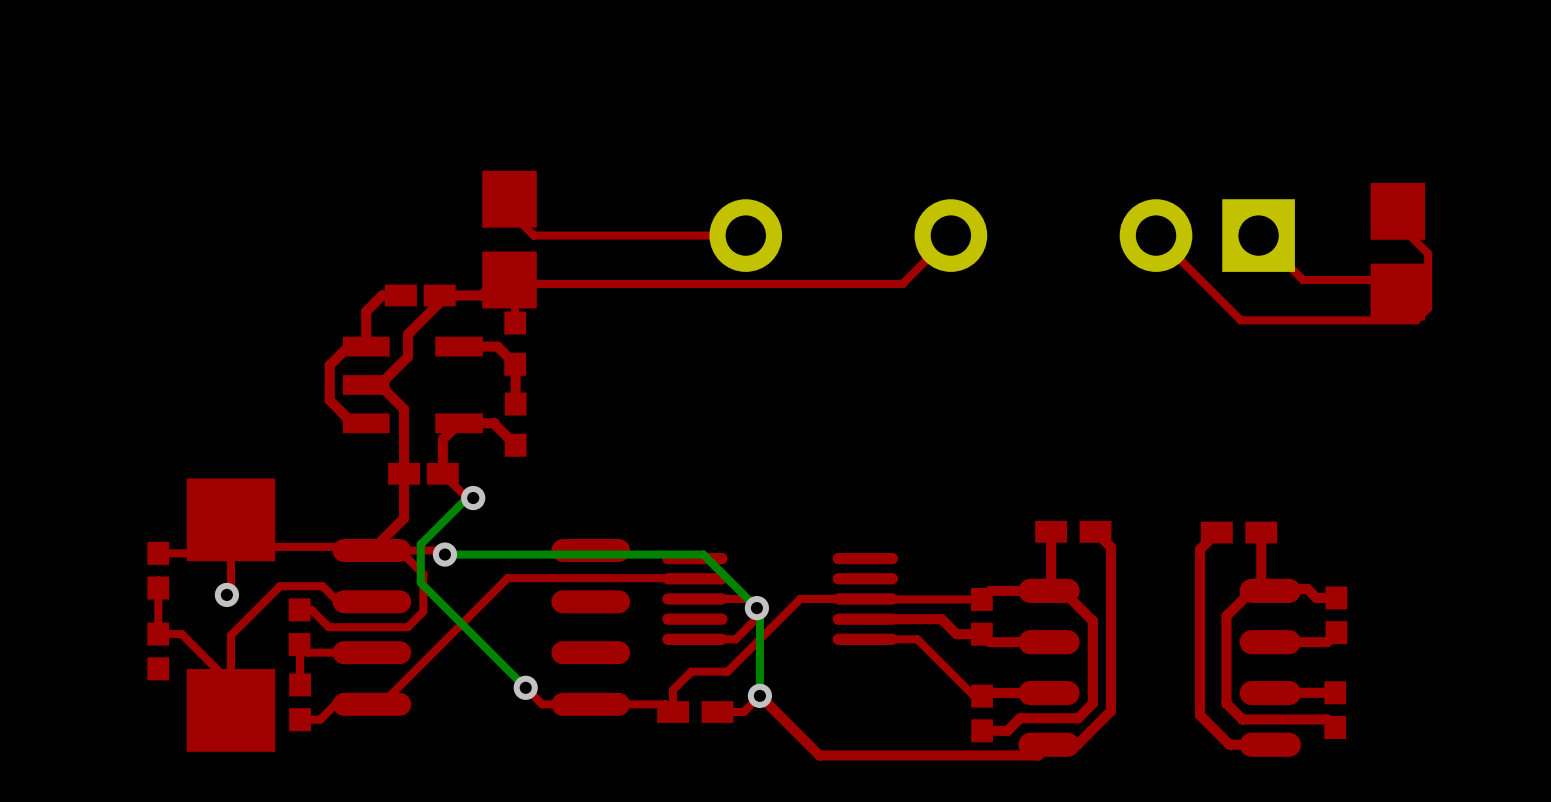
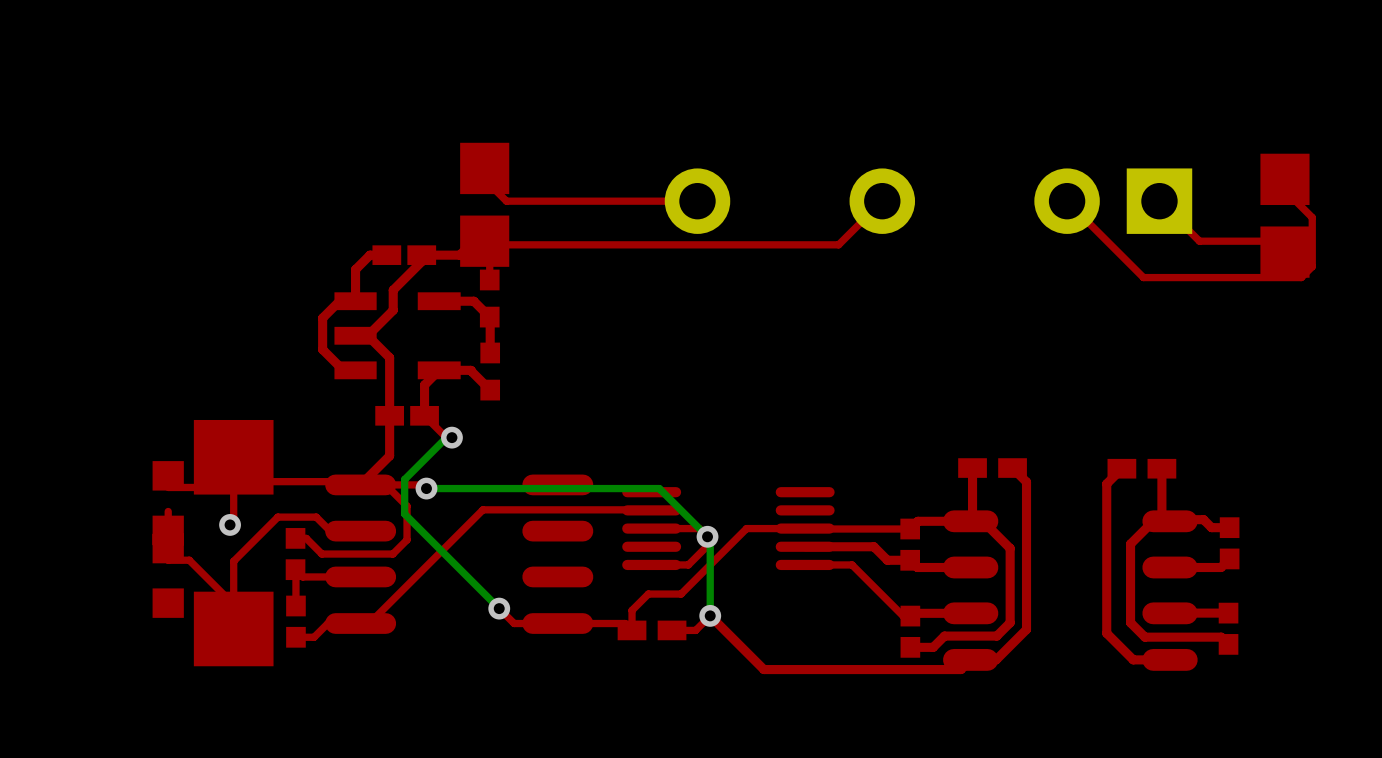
part footprint: [147, 541, 170, 600] -> [152, 461, 184, 546]
part footprint: [147, 622, 170, 681] -> [152, 533, 184, 618]

